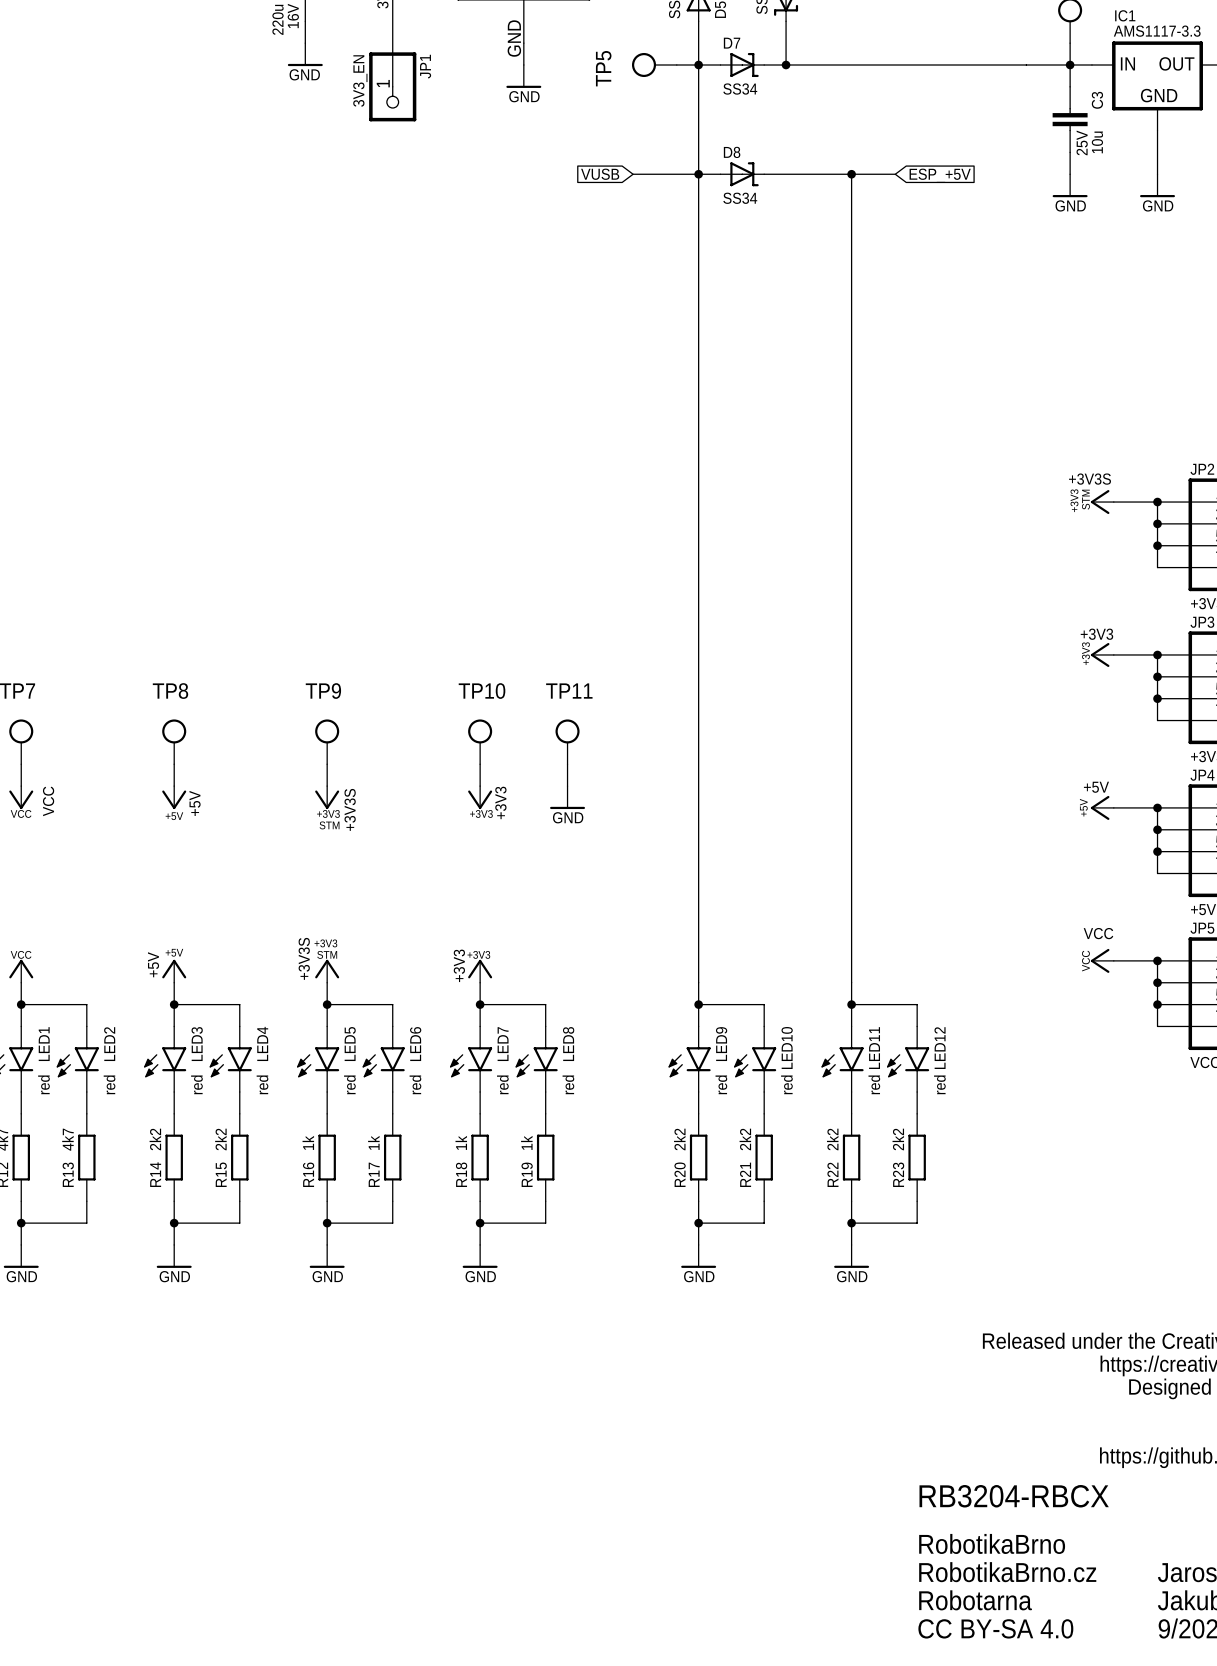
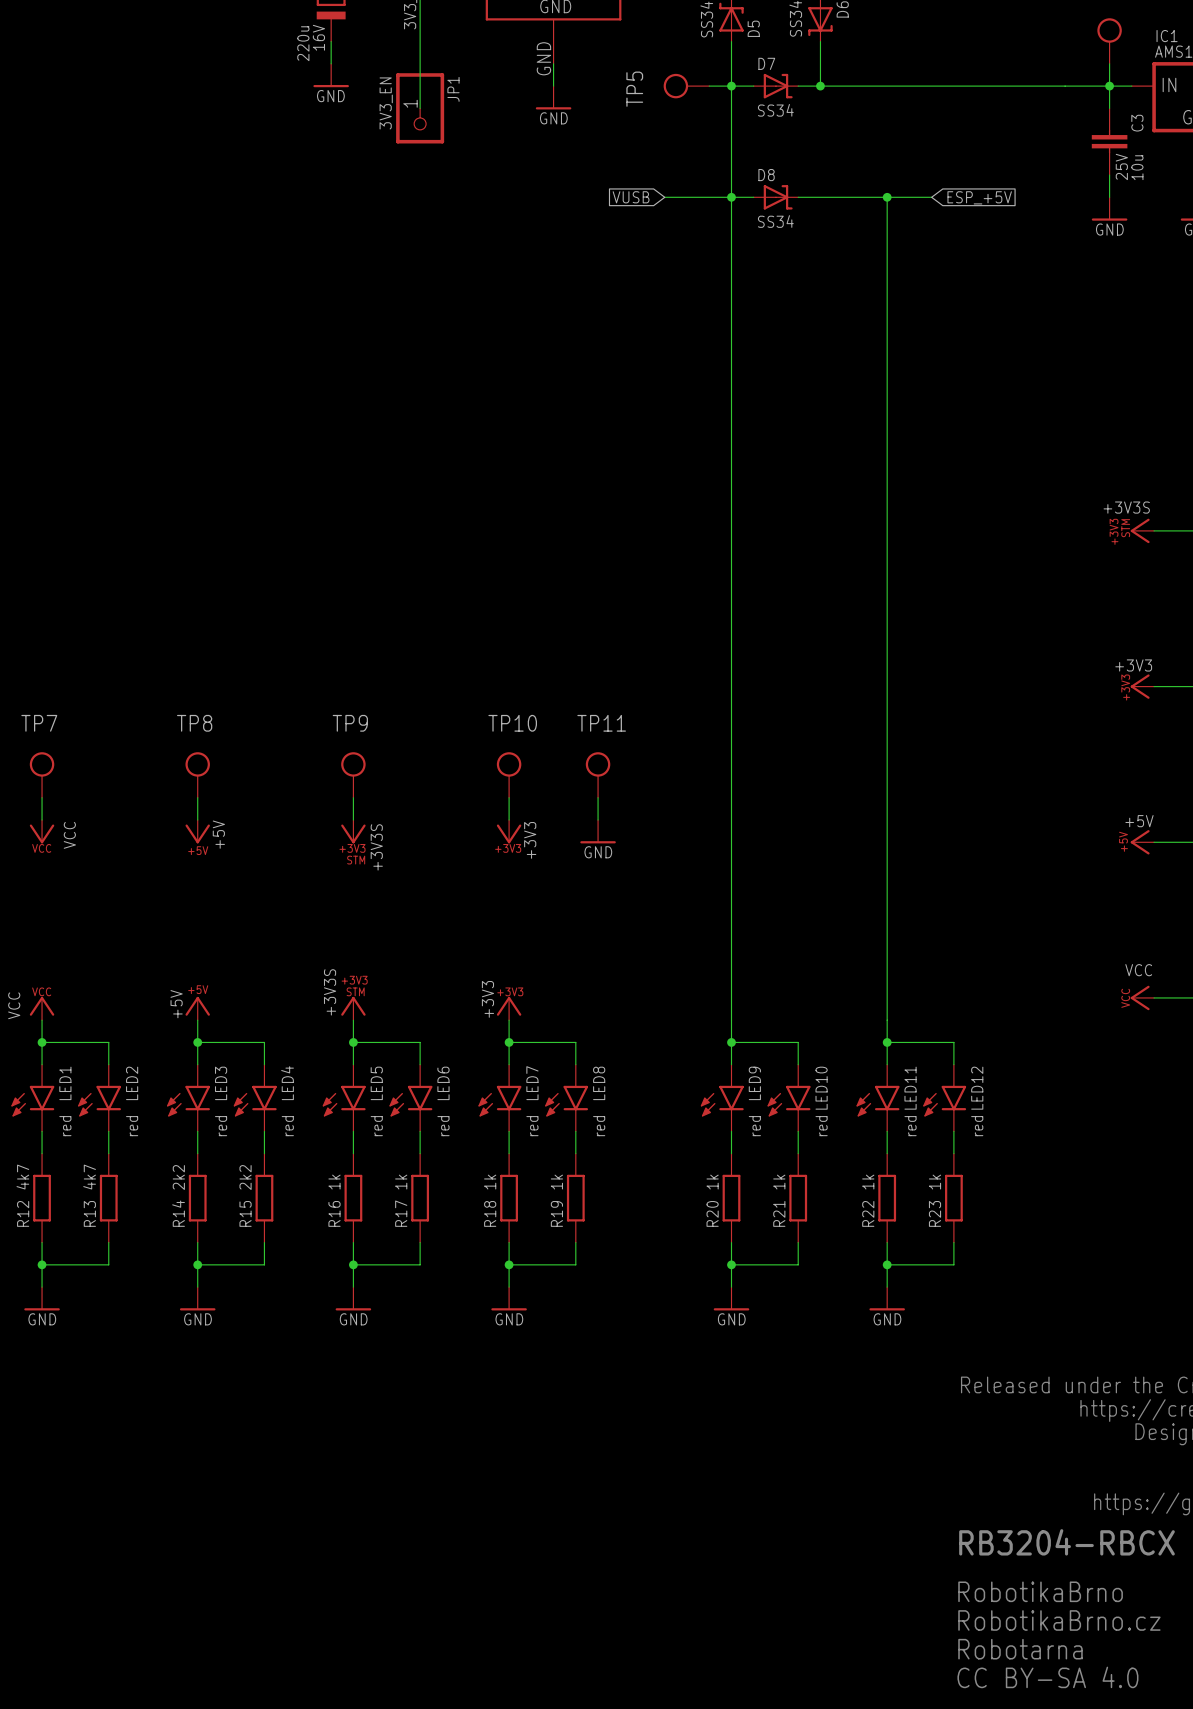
R20 value: 2k2 (679, 1139) -> 1k (712, 1182)
R21 value: 2k2 (745, 1139) -> 1k (779, 1182)
R22 value: 2k2 (832, 1139) -> 1k (868, 1182)
R23 value: 2k2 (898, 1139) -> 1k (935, 1182)

